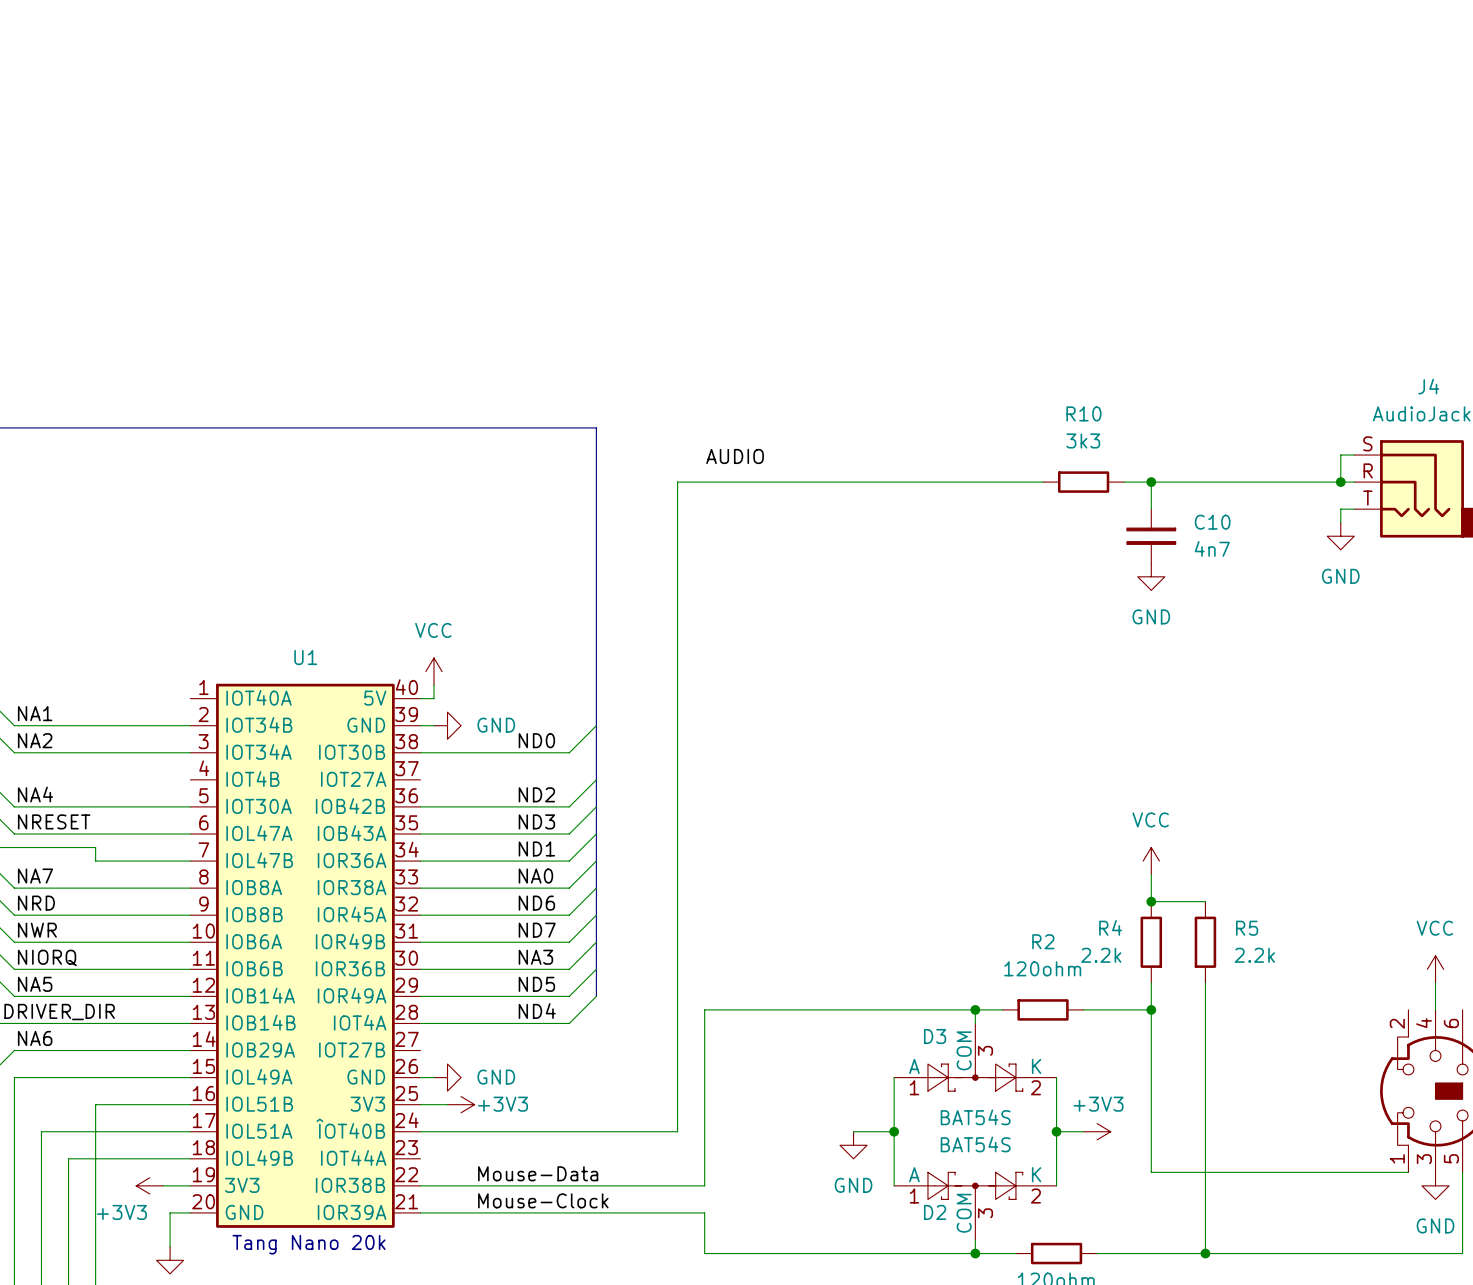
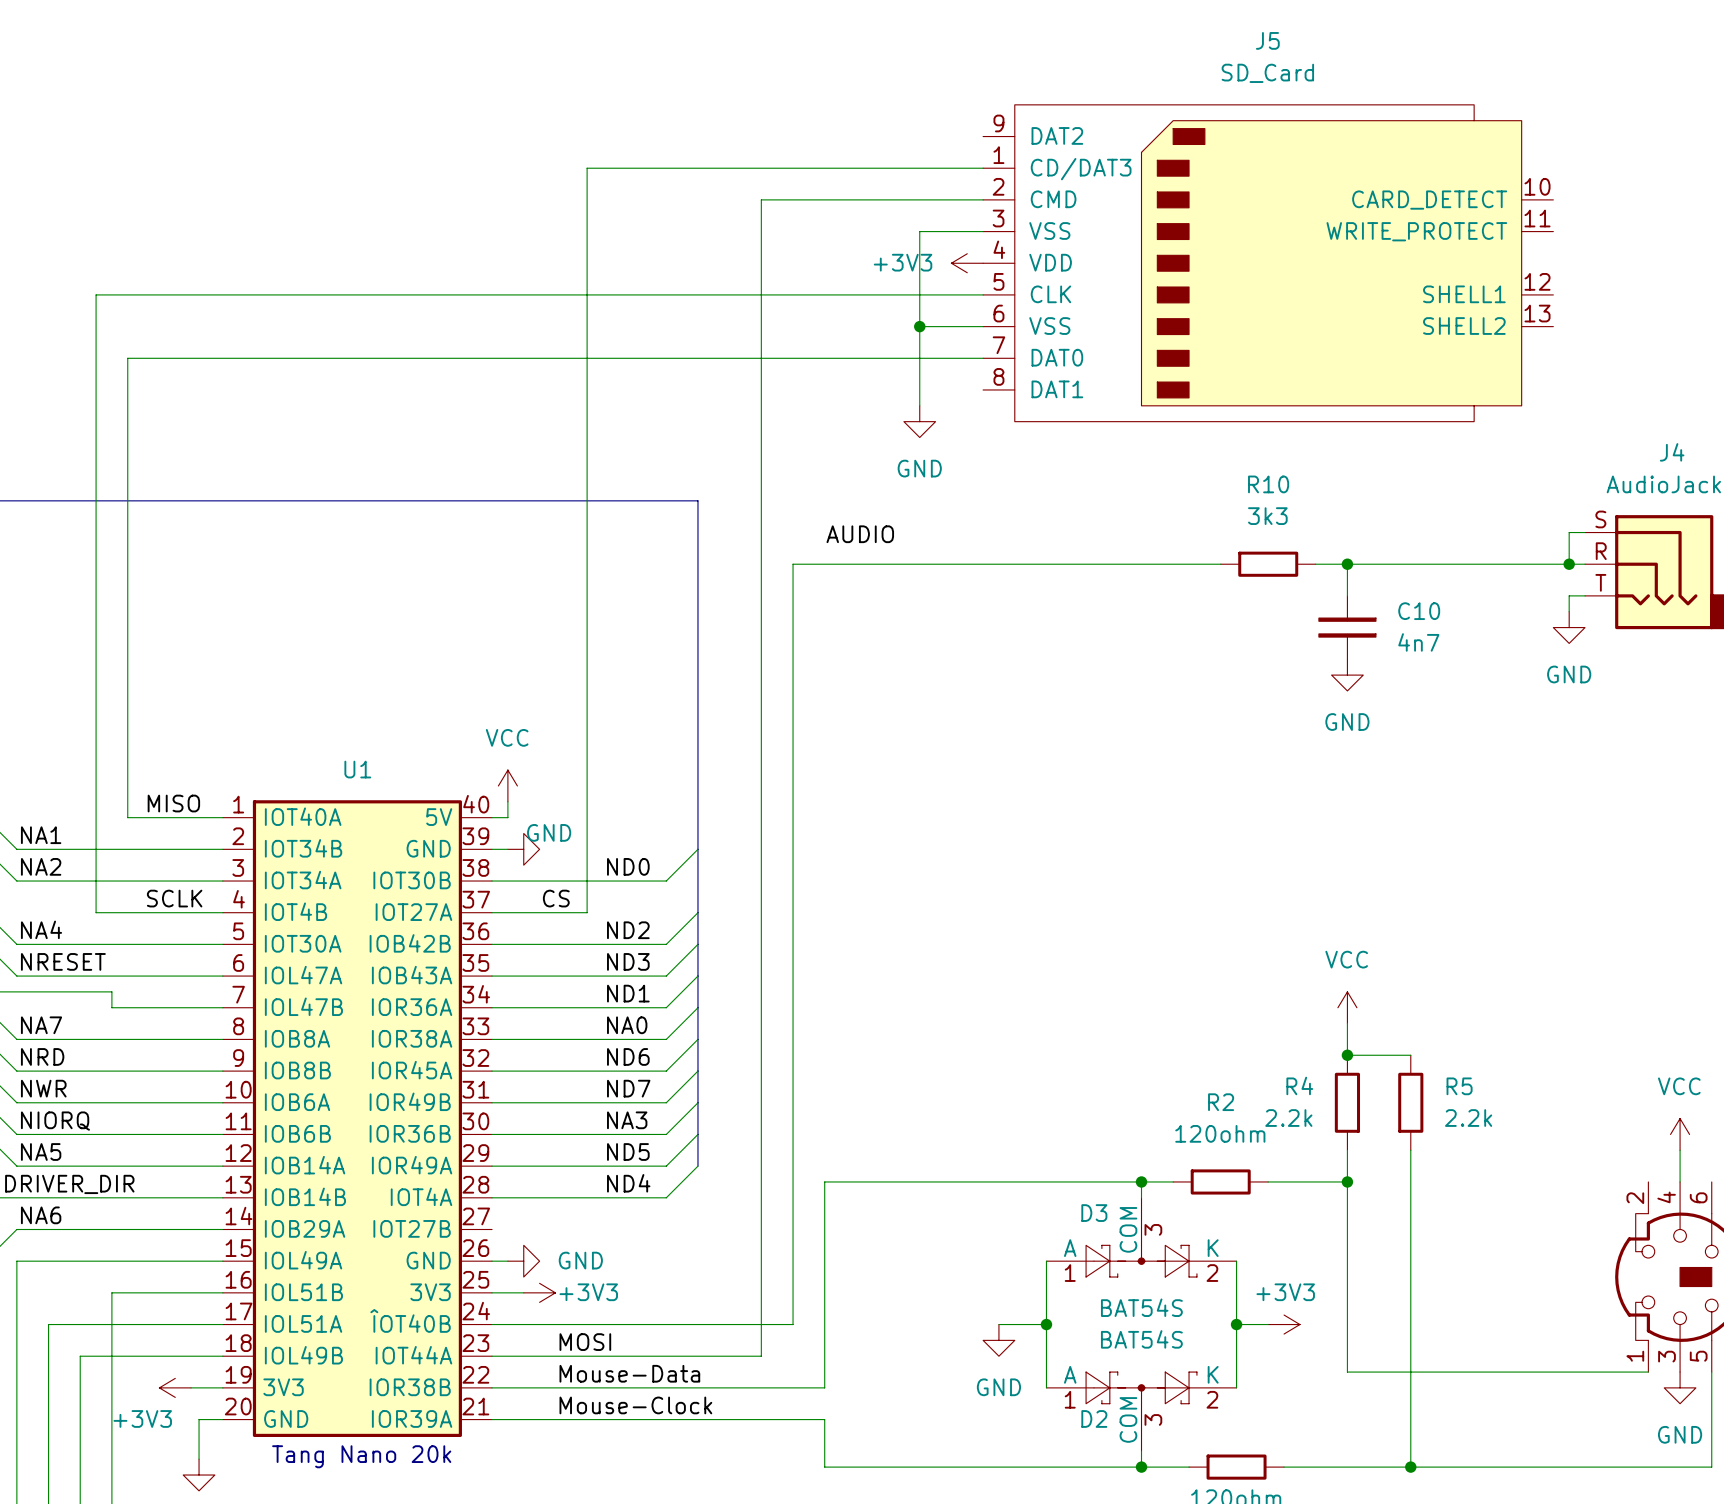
wire: none -> (983, 168) (587, 168) (587, 912) (492, 912)
wire: none -> (983, 199) (761, 199) (761, 1356) (492, 1356)
wire: none -> (983, 231) (919, 231) (919, 405)
power symbol: none -> +3V3 (967, 263)
J5: none -> SD_Card (1268, 263)
wire: none -> (983, 294) (96, 294) (96, 912) (222, 912)
wire: none -> (919, 326) (983, 326)
junction: none -> (919, 326)
wire: none -> (983, 358) (127, 358) (127, 817) (222, 817)
power symbol: none -> GND (919, 421)
label: none -> MISO (173, 803)
power symbol text position: GND (496, 725) -> GND (549, 832)
label: none -> SCLK (174, 898)
label: none -> CS (556, 898)
label: none -> MOSI (585, 1342)

